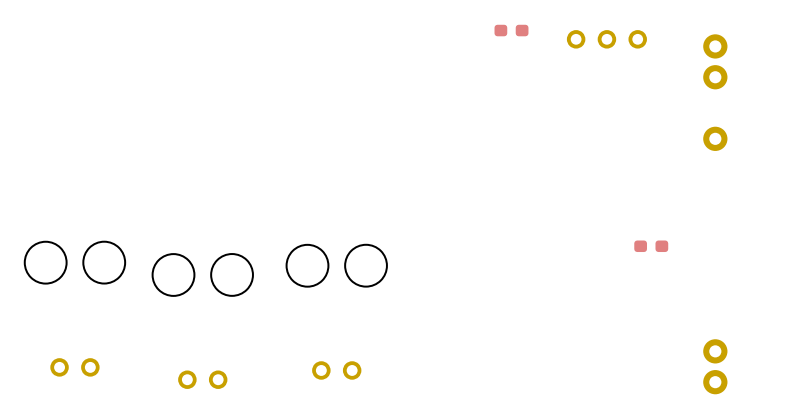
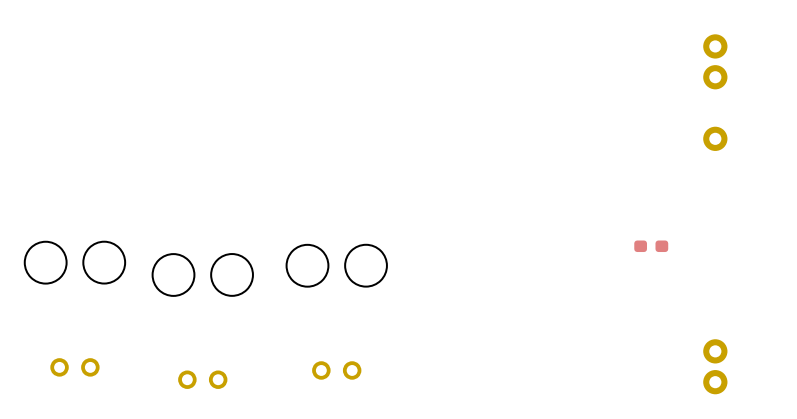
part: (511, 30) -> none
part: (606, 39) -> none

